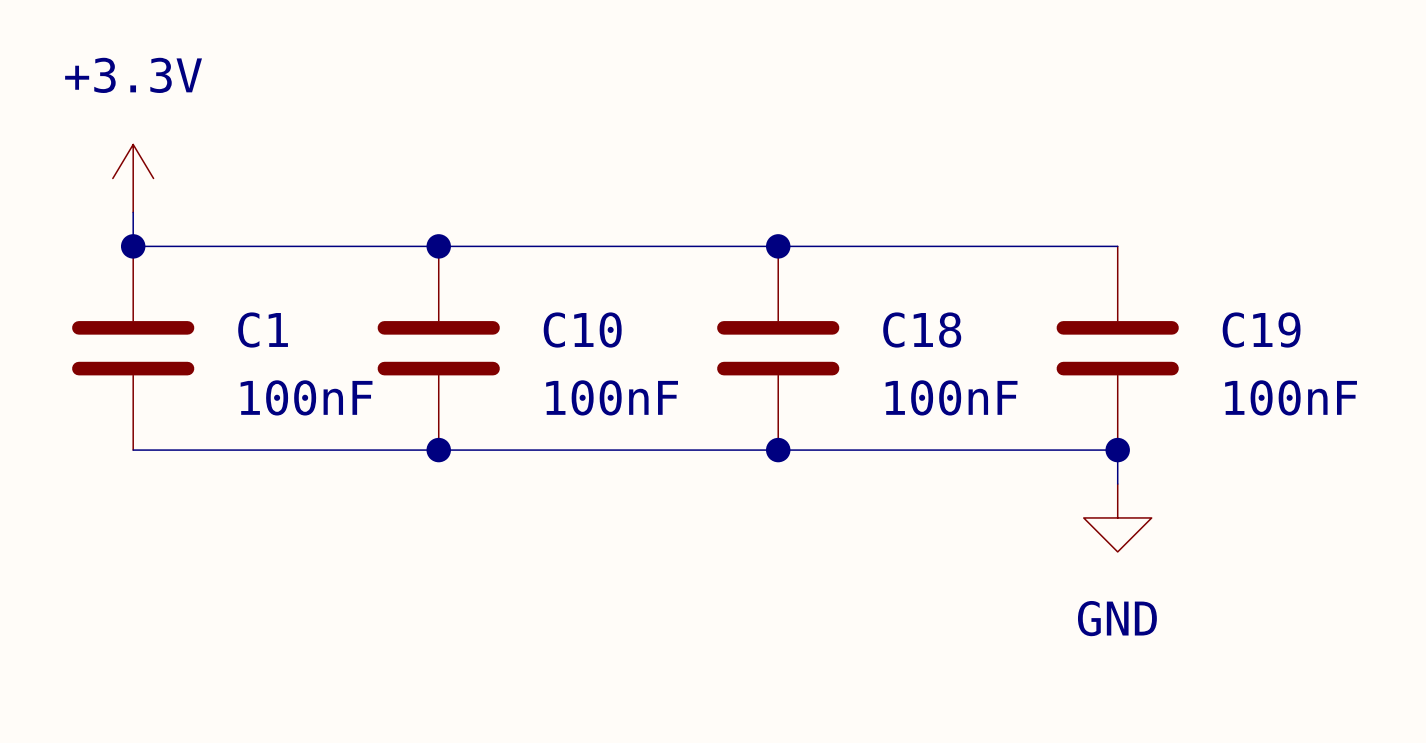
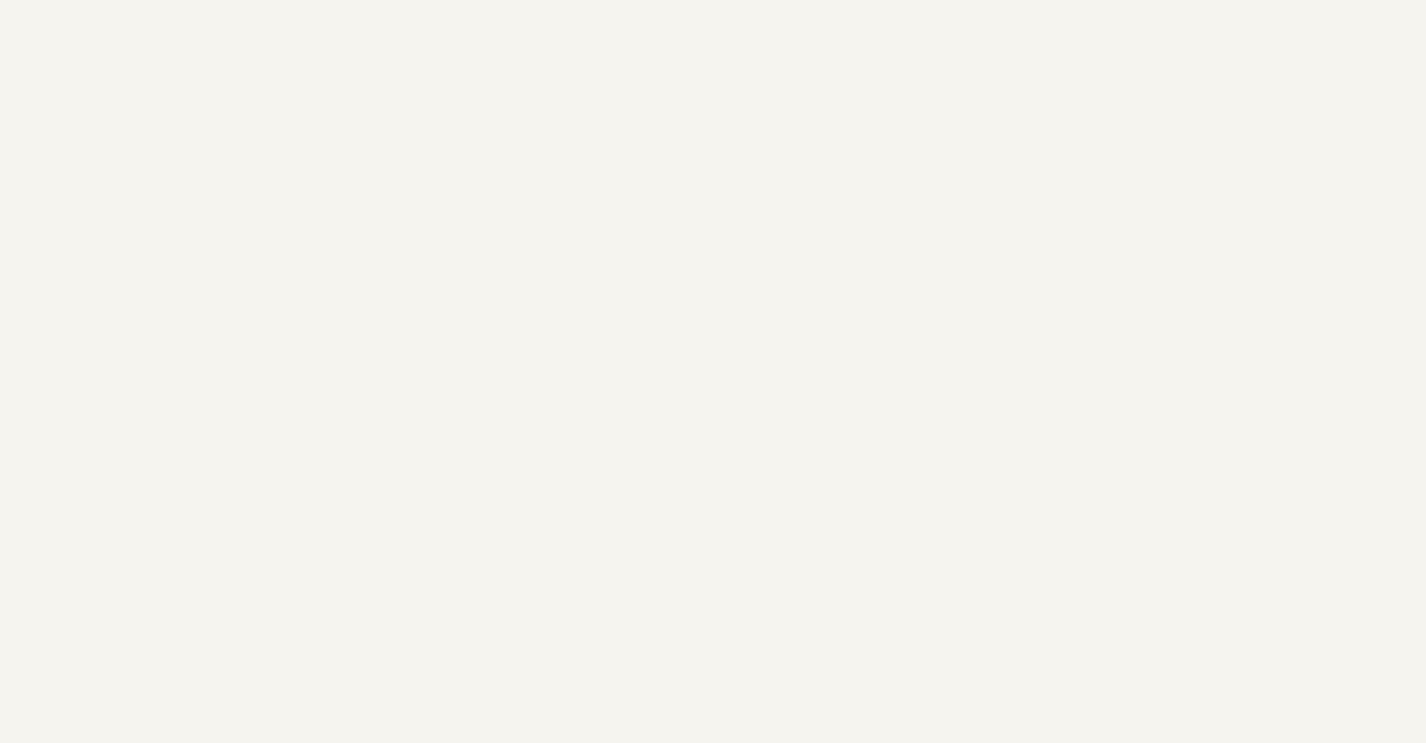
power symbol: +3.3V (133, 178) -> none
wire: (133, 212) (133, 246) (1117, 246) -> none
junction: (133, 246) -> none
junction: (438, 246) -> none
junction: (778, 246) -> none
C1: 100nF (133, 348) -> none
C10: 100nF (438, 348) -> none
C18: 100nF (778, 348) -> none
C19: 100nF (1117, 348) -> none
wire: (133, 450) (1117, 450) (1117, 484) -> none
junction: (438, 450) -> none
junction: (778, 450) -> none
junction: (1117, 450) -> none
power symbol: GND (1117, 517) -> none

